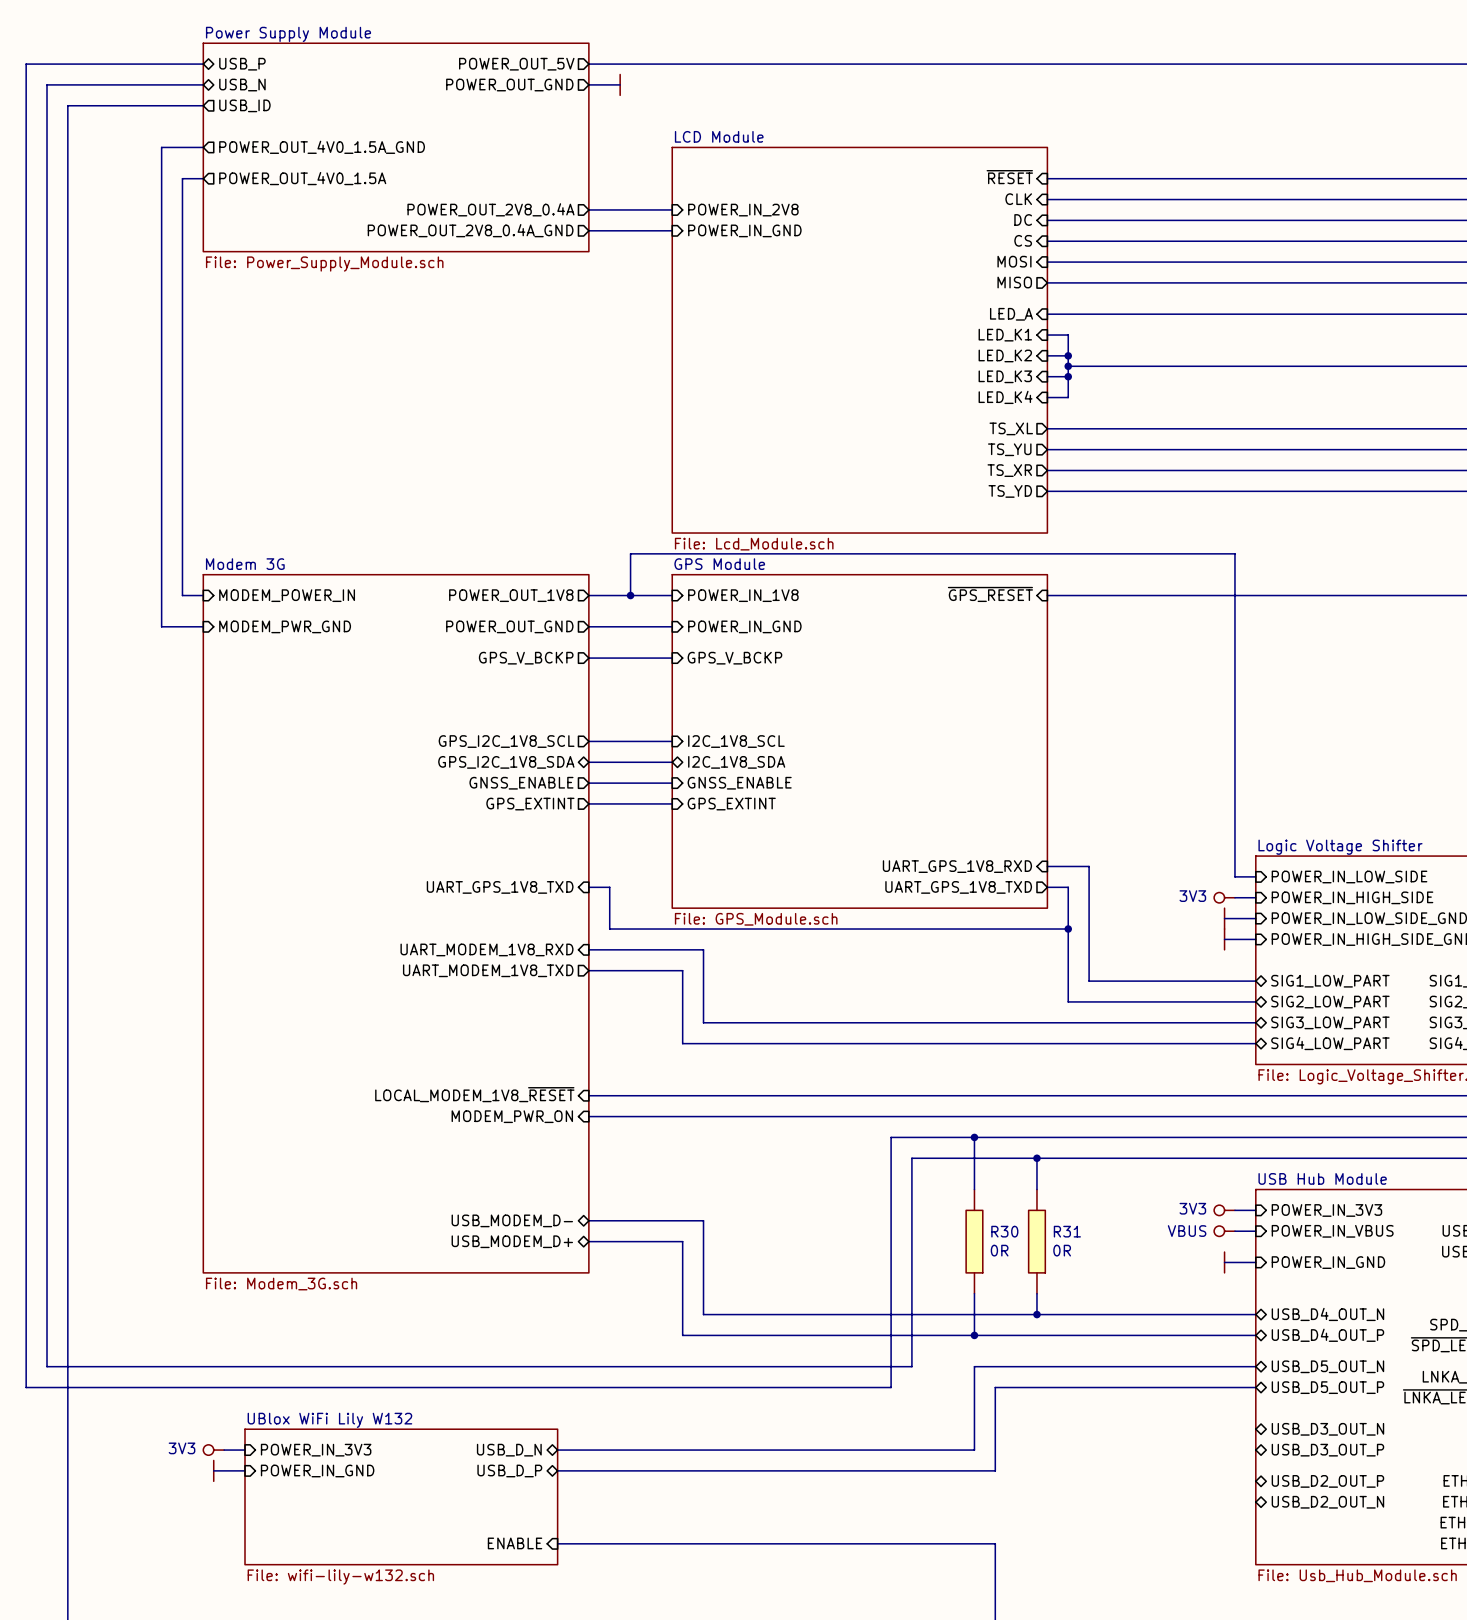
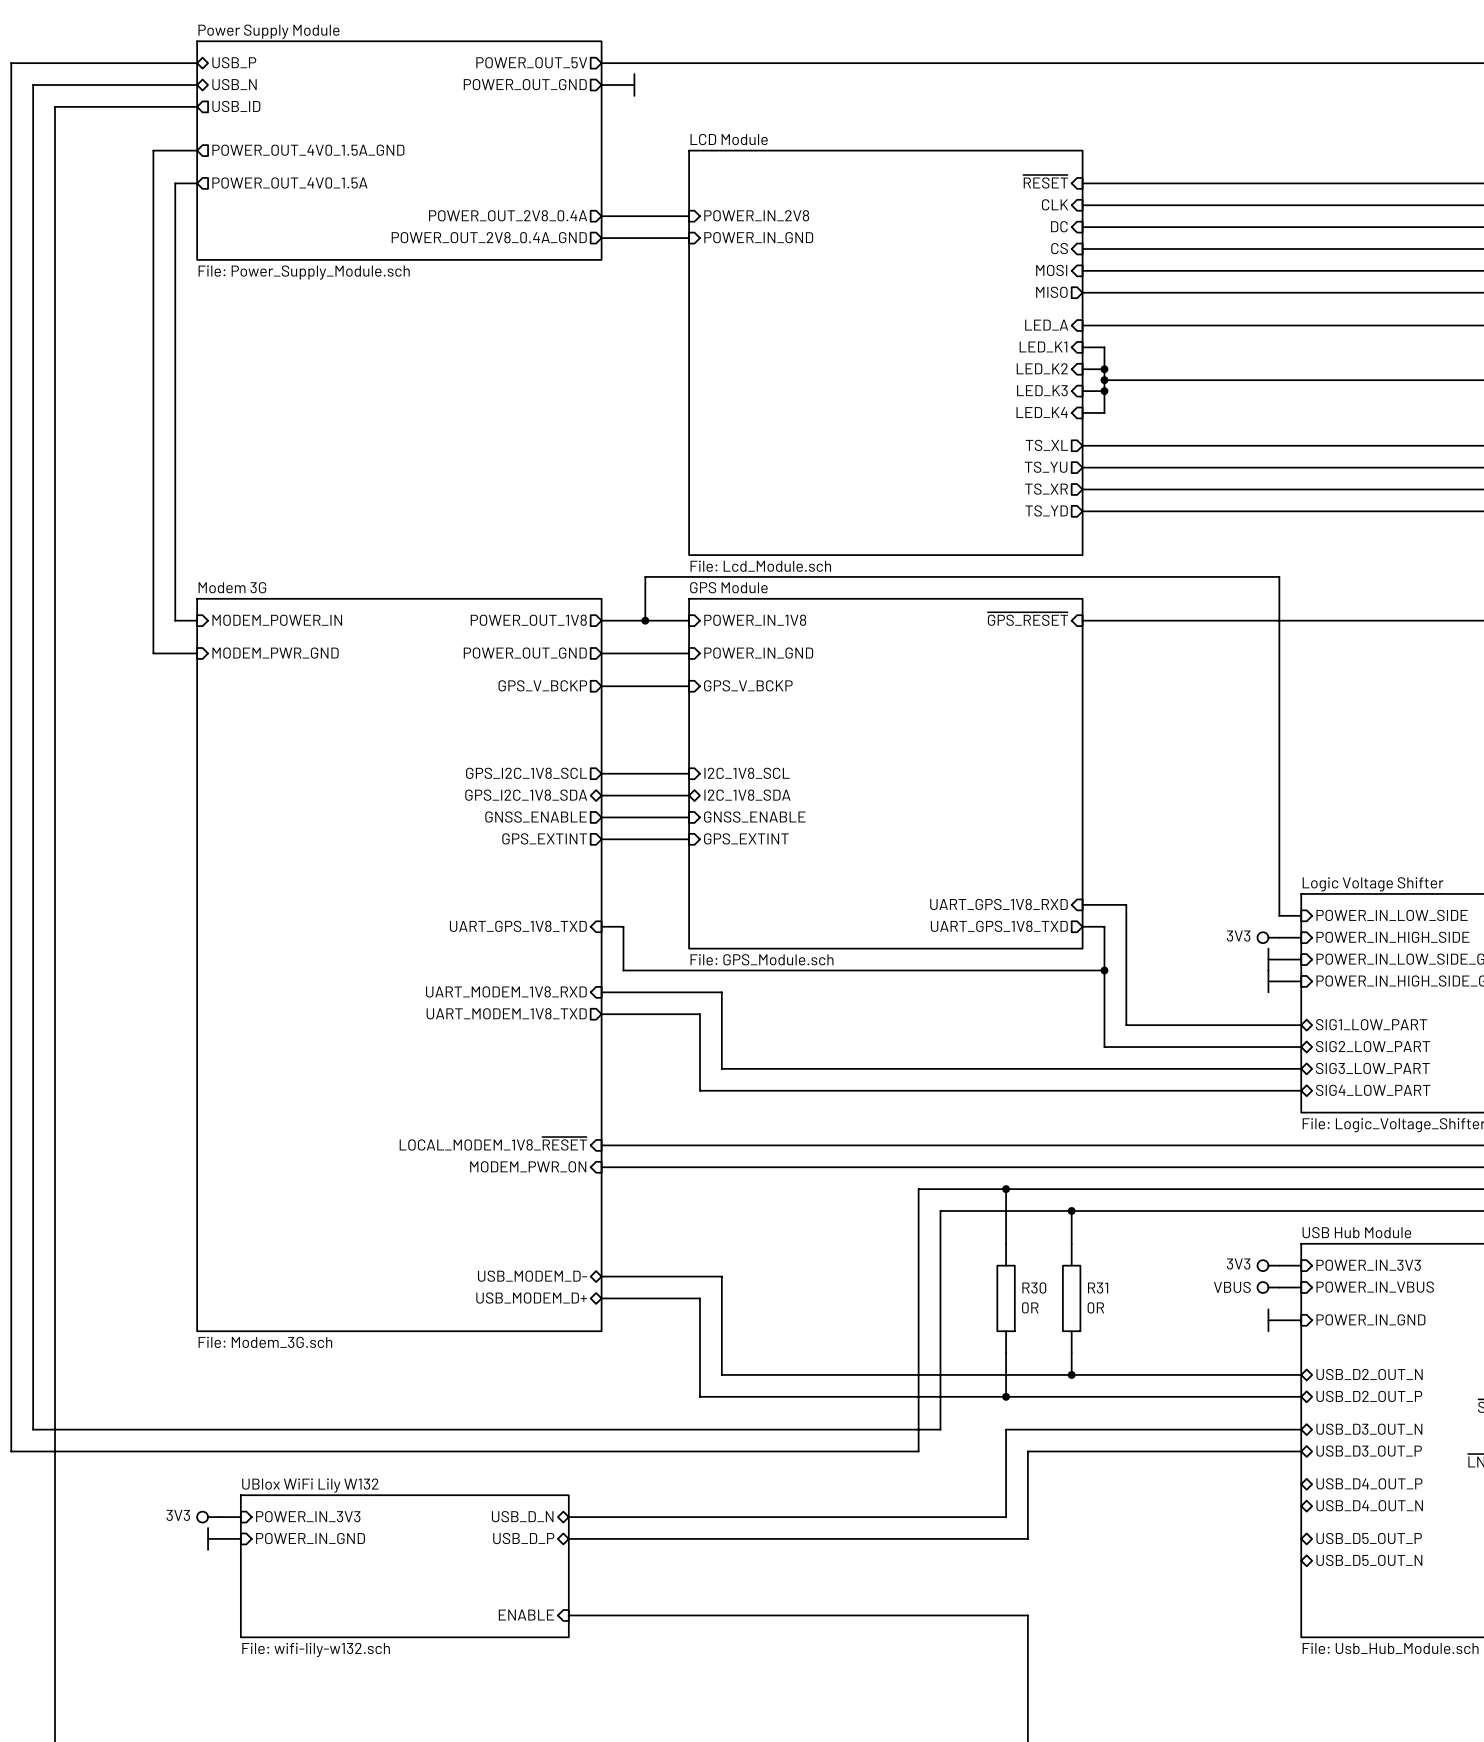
sheet pin: USB_D4_OUT_N (1327, 1314) -> USB_D2_OUT_N (1369, 1374)
sheet pin: USB_D4_OUT_P (1327, 1335) -> USB_D2_OUT_P (1369, 1396)
sheet pin: USB_D5_OUT_N (1327, 1366) -> USB_D3_OUT_N (1369, 1429)
sheet pin: USB_D5_OUT_P (1327, 1387) -> USB_D3_OUT_P (1369, 1451)
sheet pin: none -> USB_D4_OUT_P (1369, 1483)
sheet pin: USB_D3_OUT_N (1327, 1429) -> none
sheet pin: none -> USB_D4_OUT_N (1369, 1505)
sheet pin: USB_D3_OUT_P (1327, 1450) -> none
sheet pin: none -> USB_D5_OUT_P (1369, 1538)
sheet pin: USB_D2_OUT_P (1327, 1481) -> none
sheet pin: none -> USB_D5_OUT_N (1369, 1560)
sheet pin: USB_D2_OUT_N (1327, 1502) -> none

